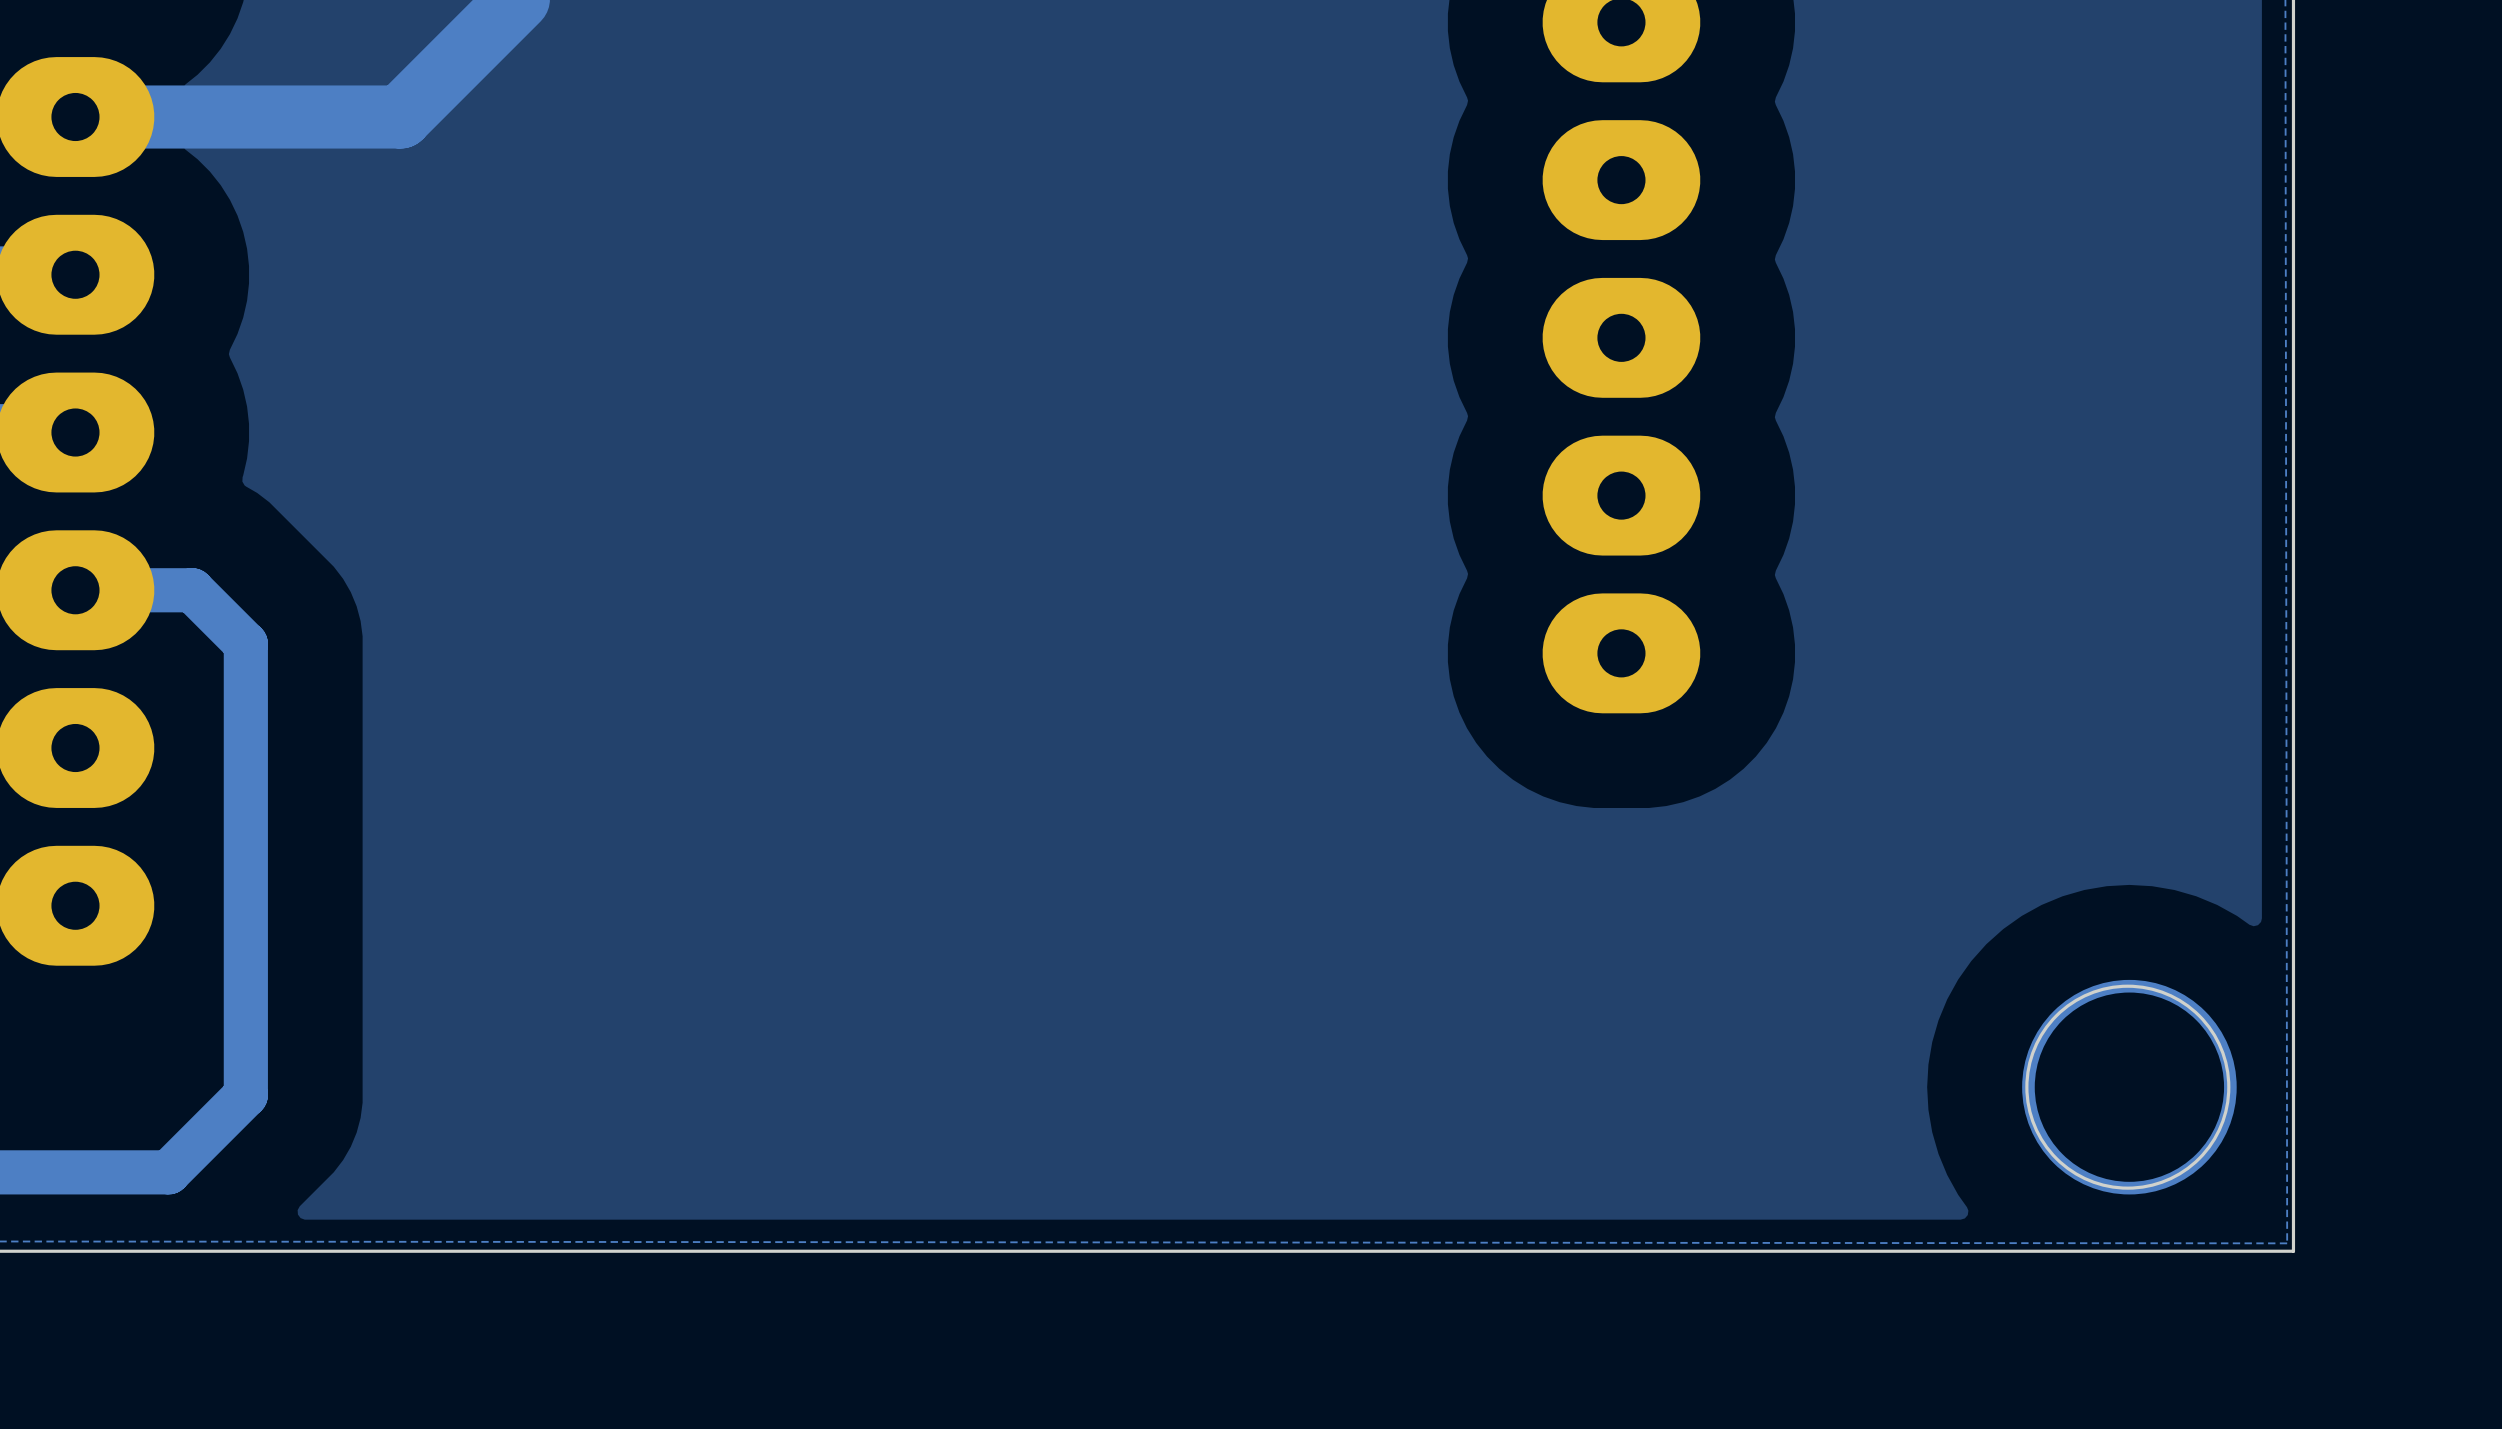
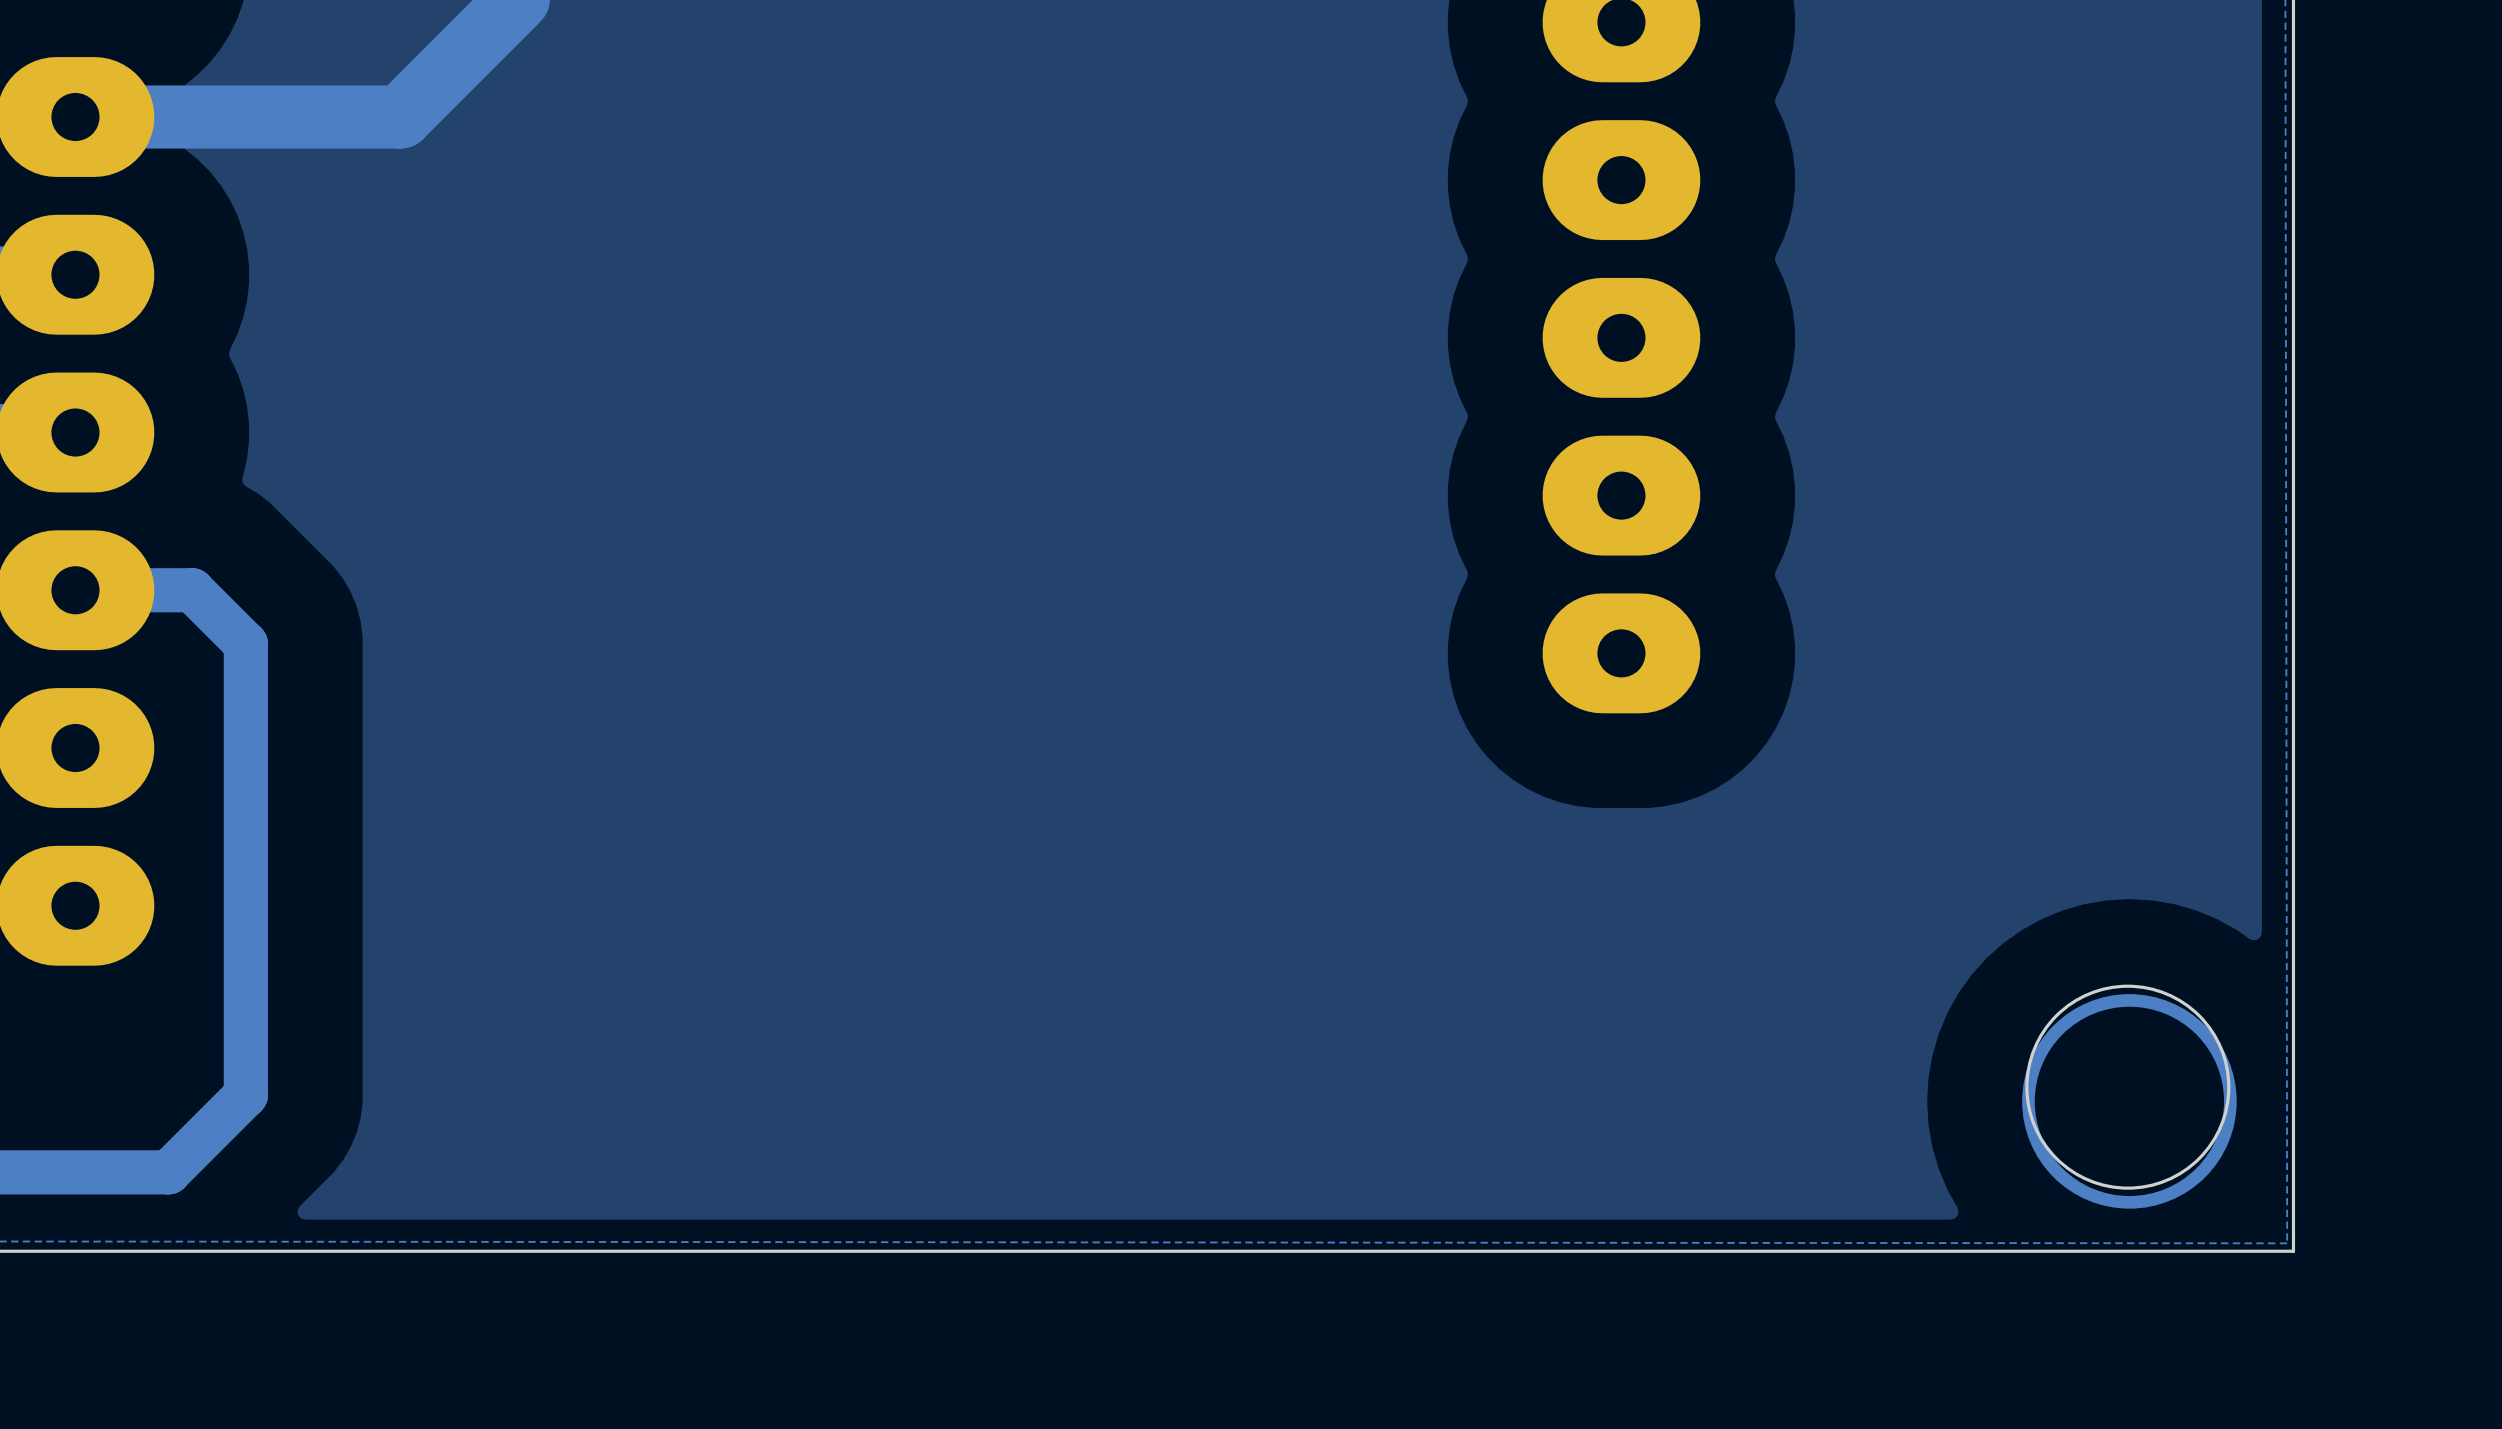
drawing position: (2129, 1087) -> (2129, 1101)

